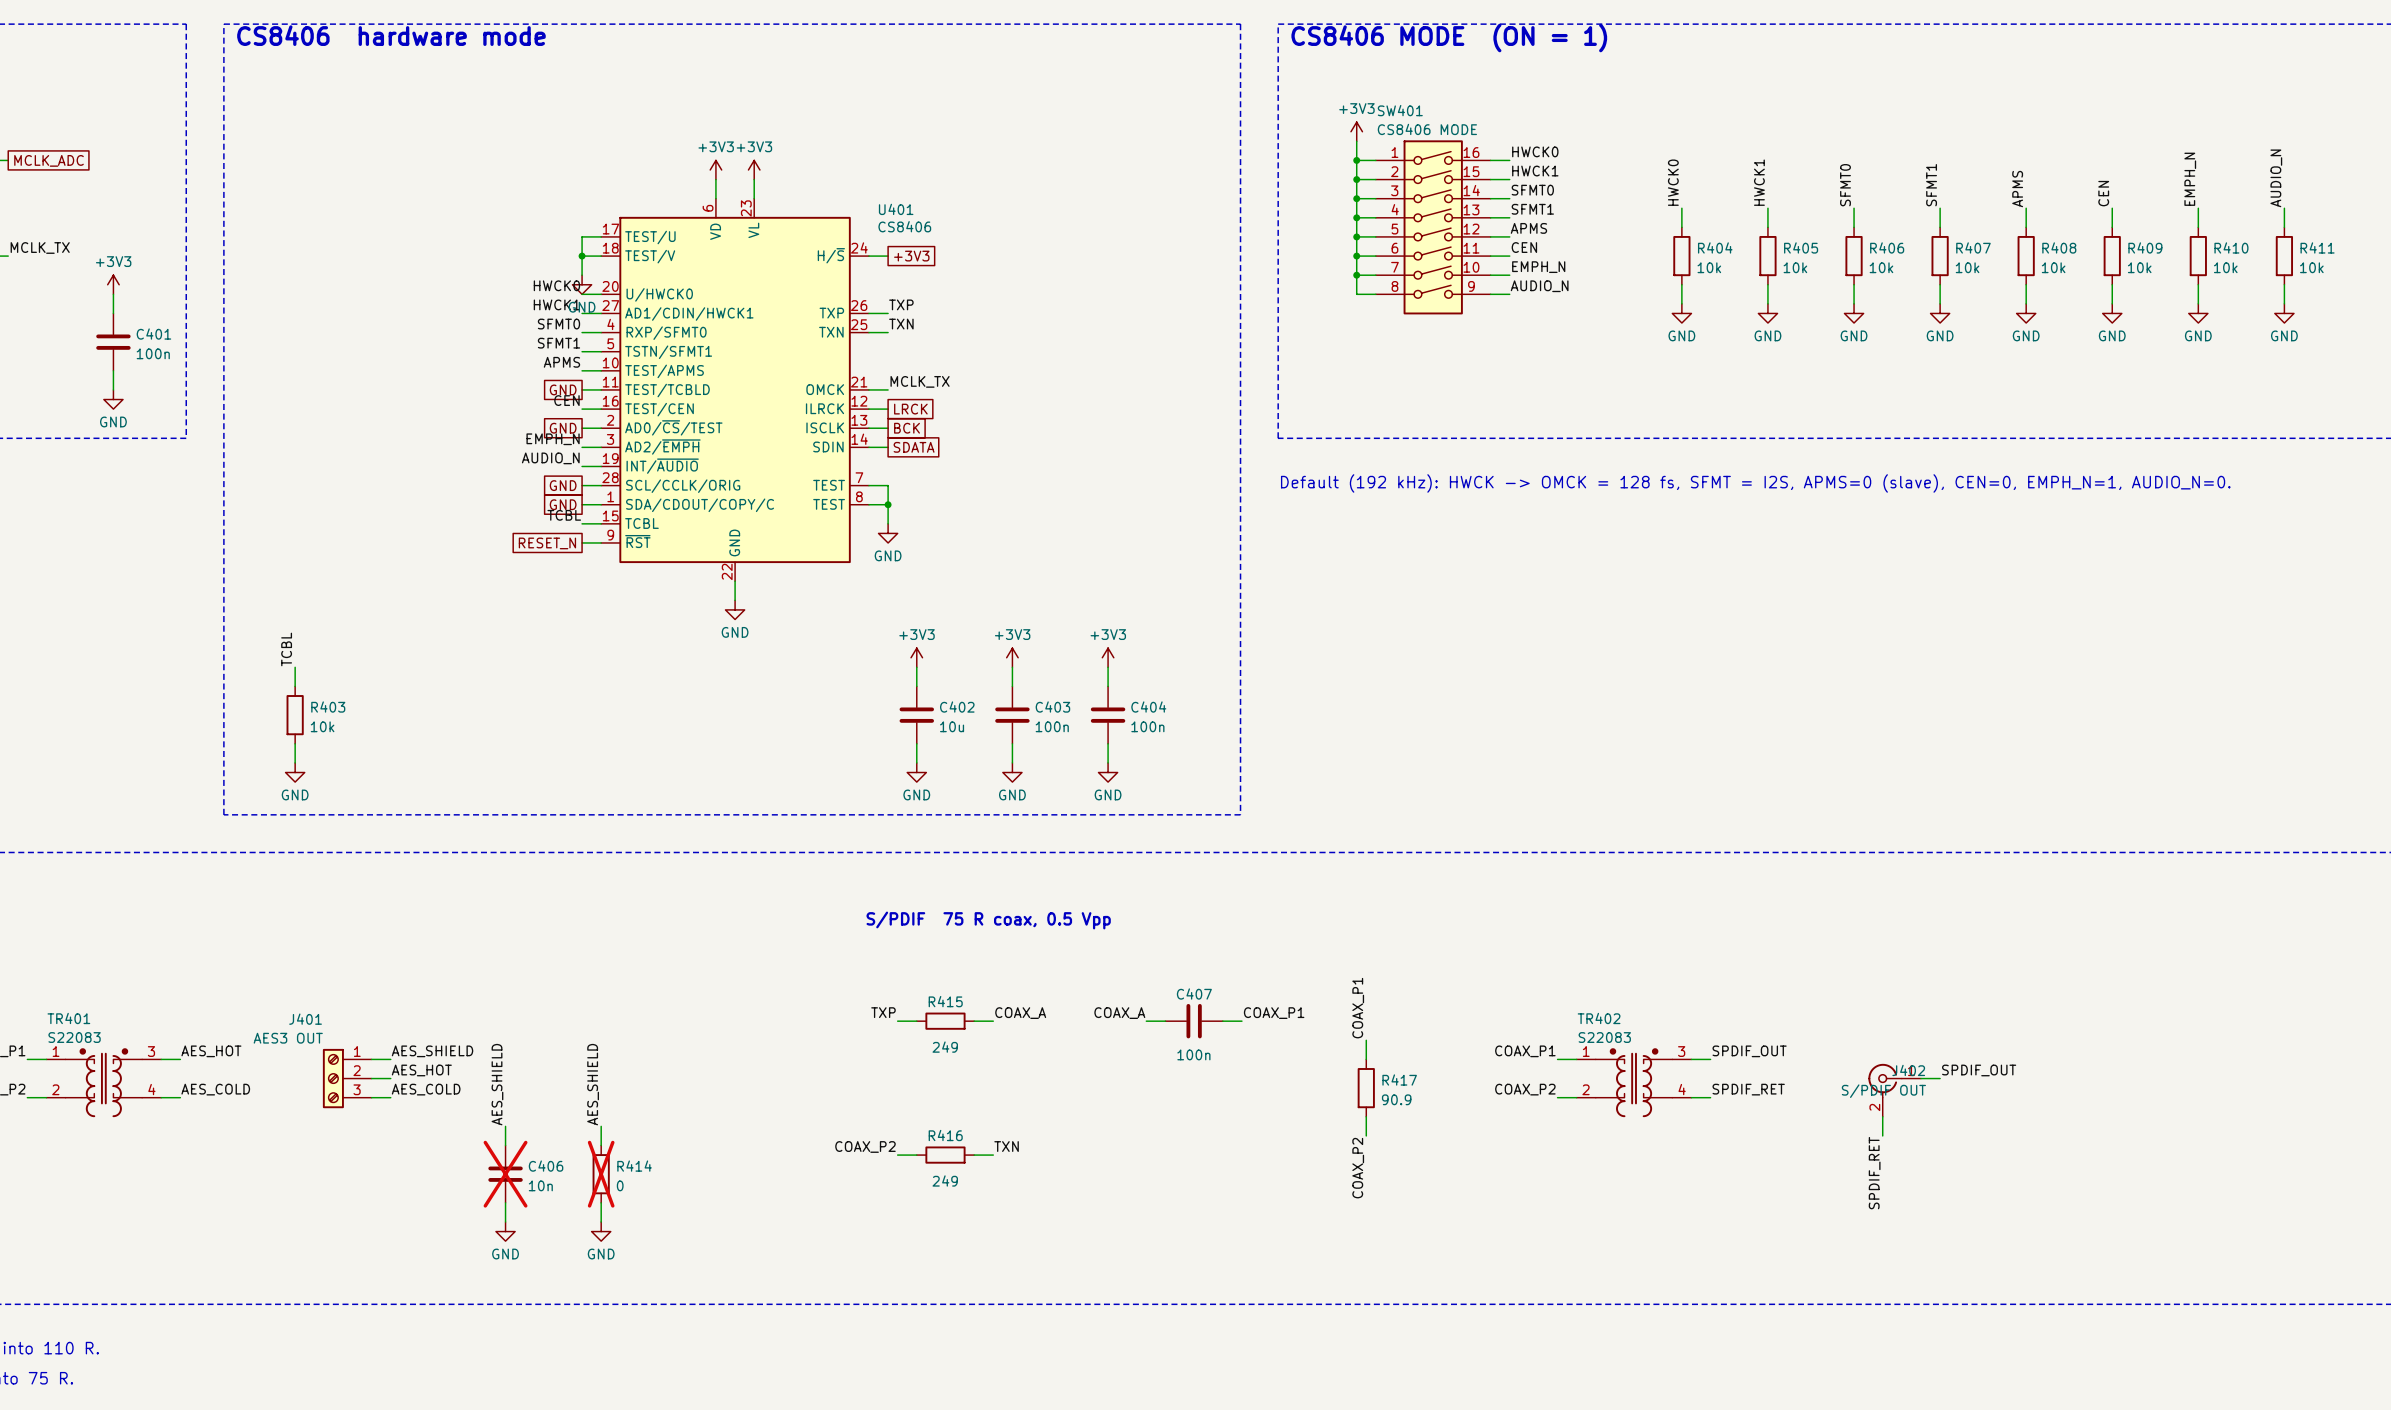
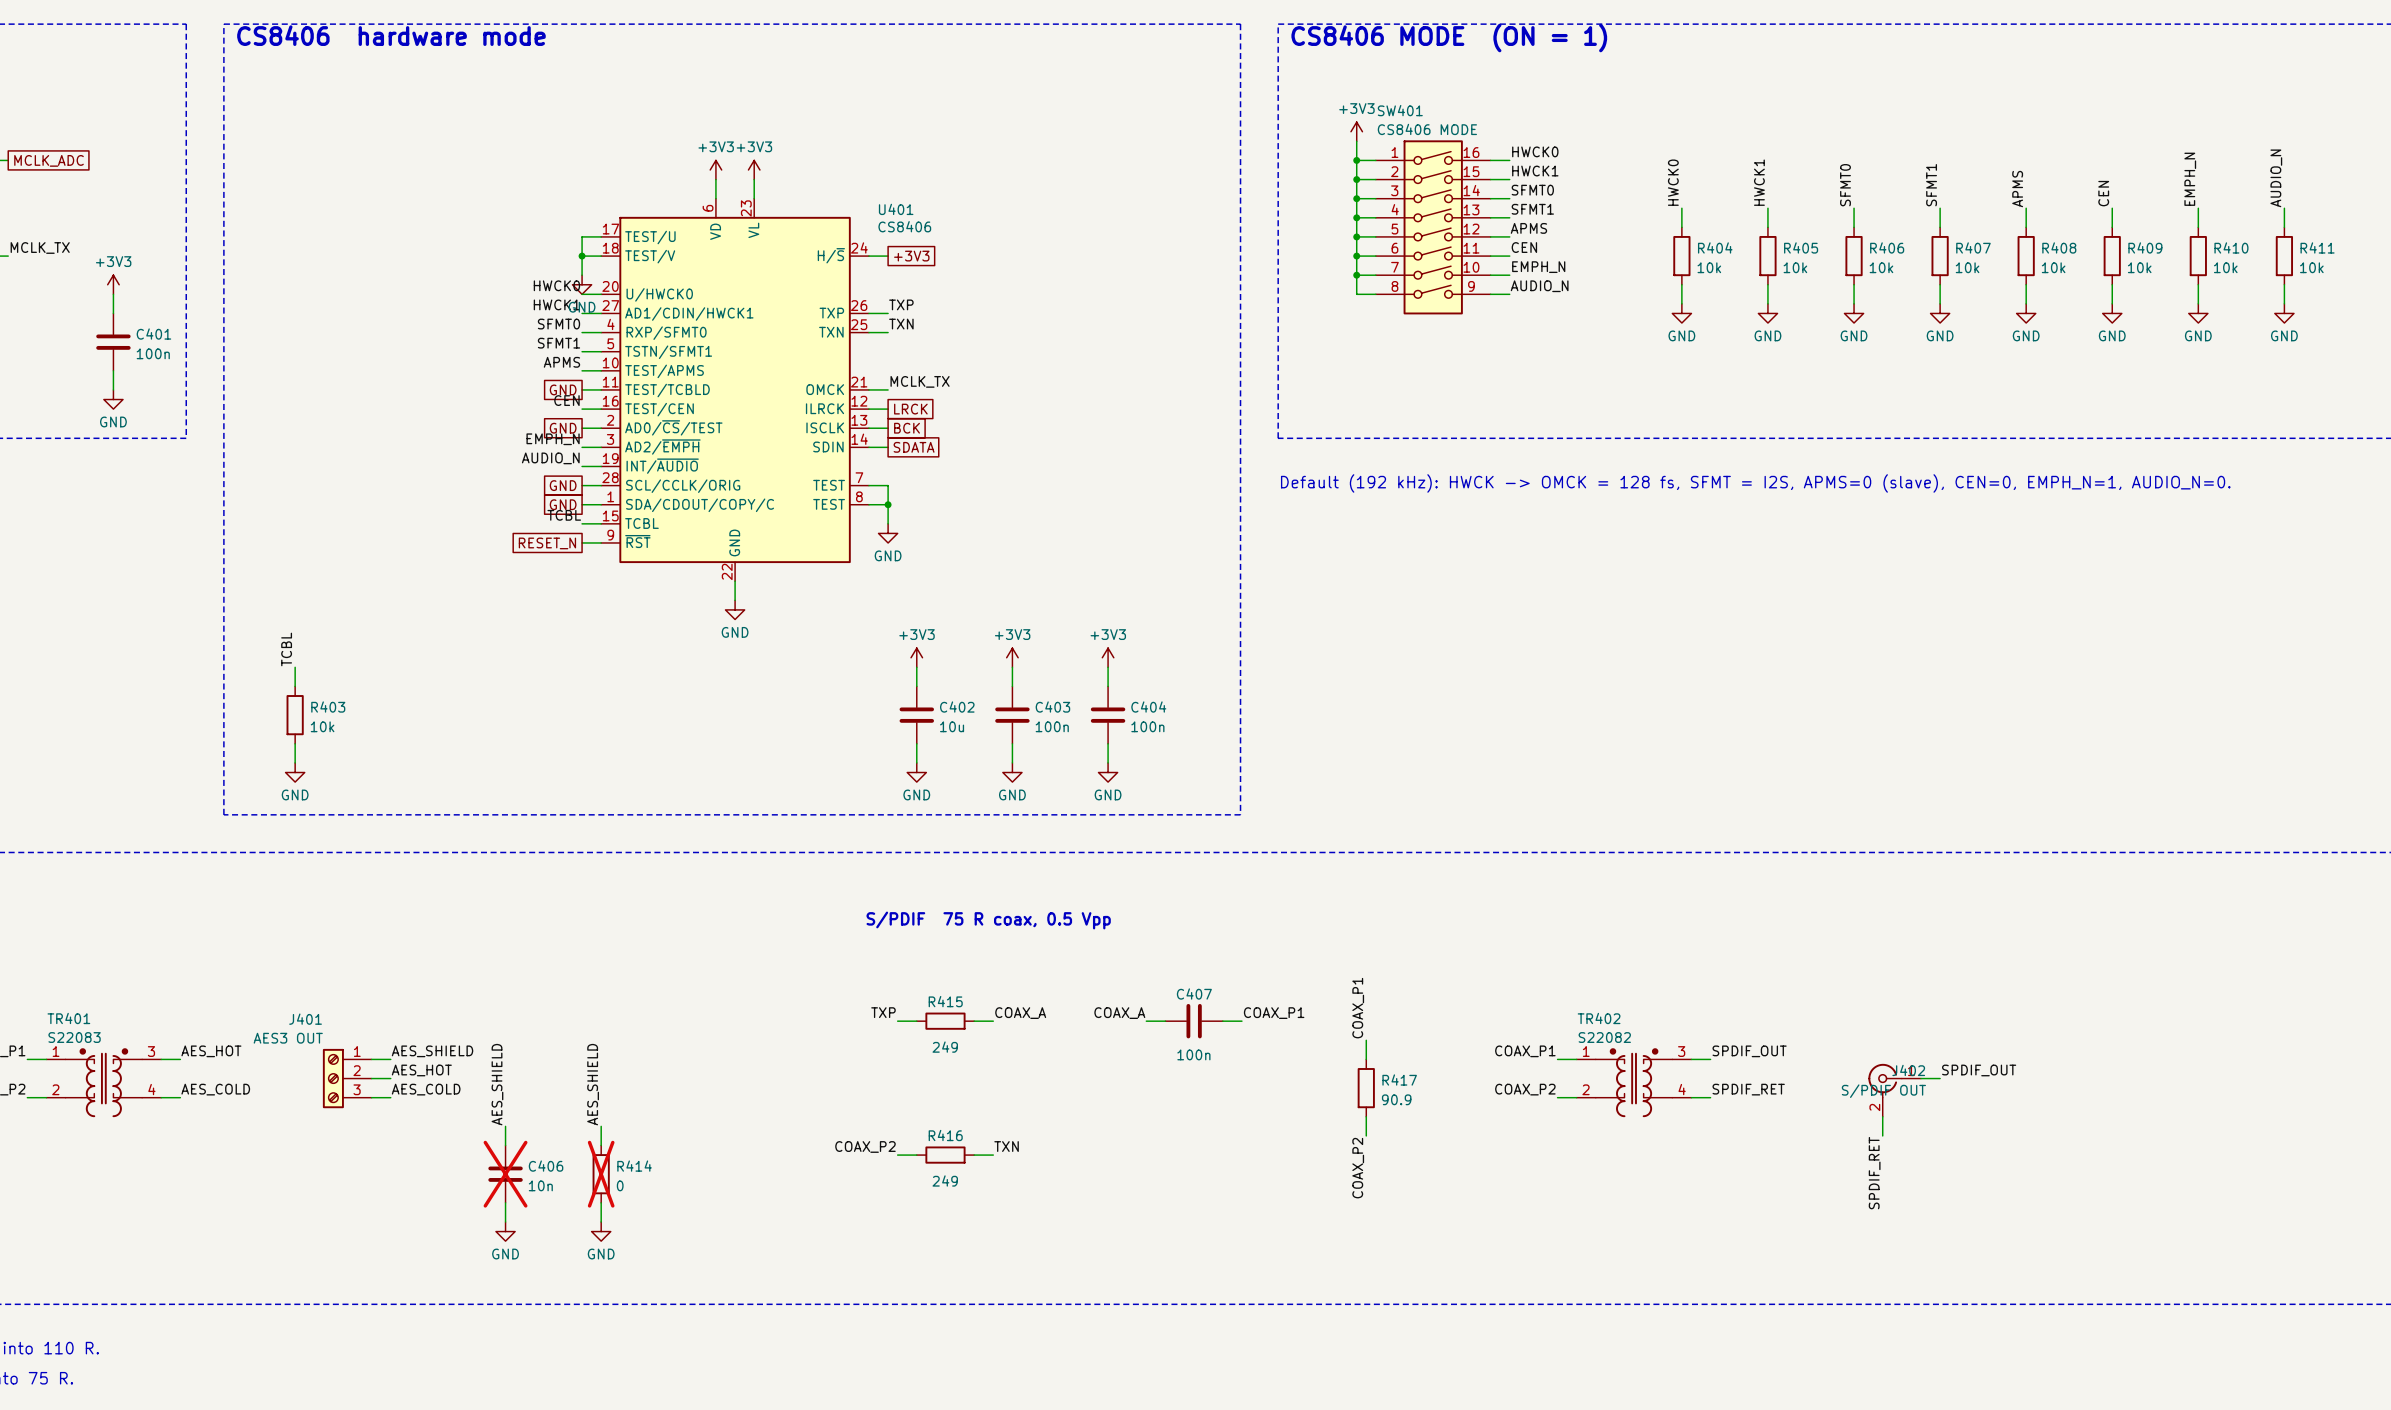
TR402 value: S22083 (1604, 1037) -> S22082 (1604, 1037)

